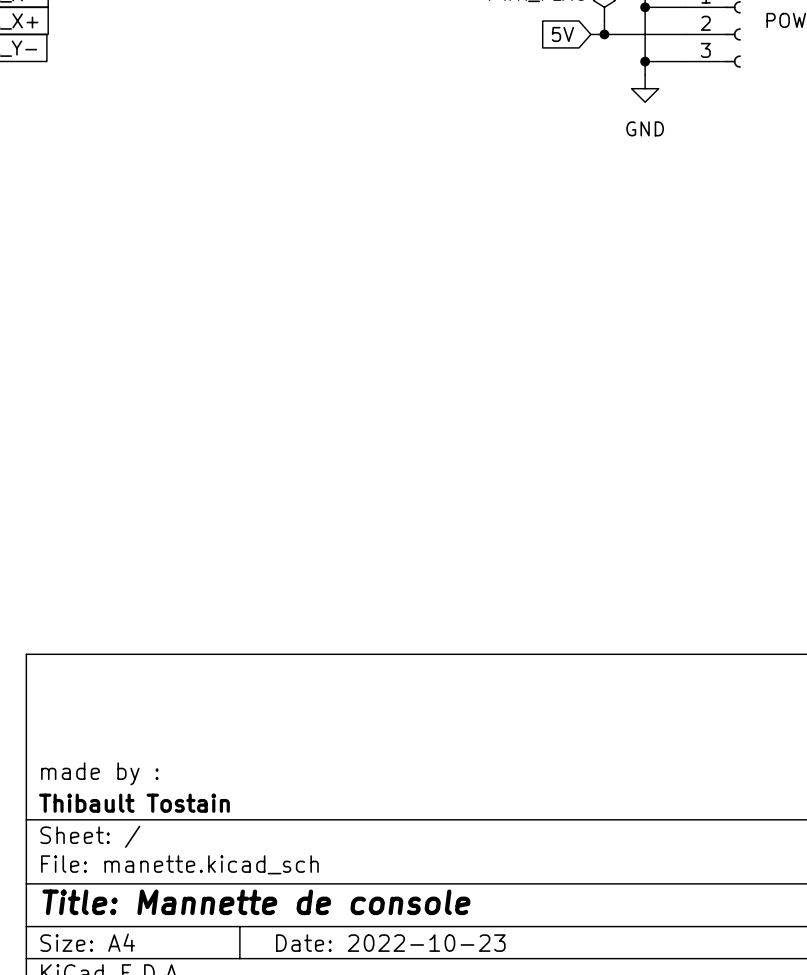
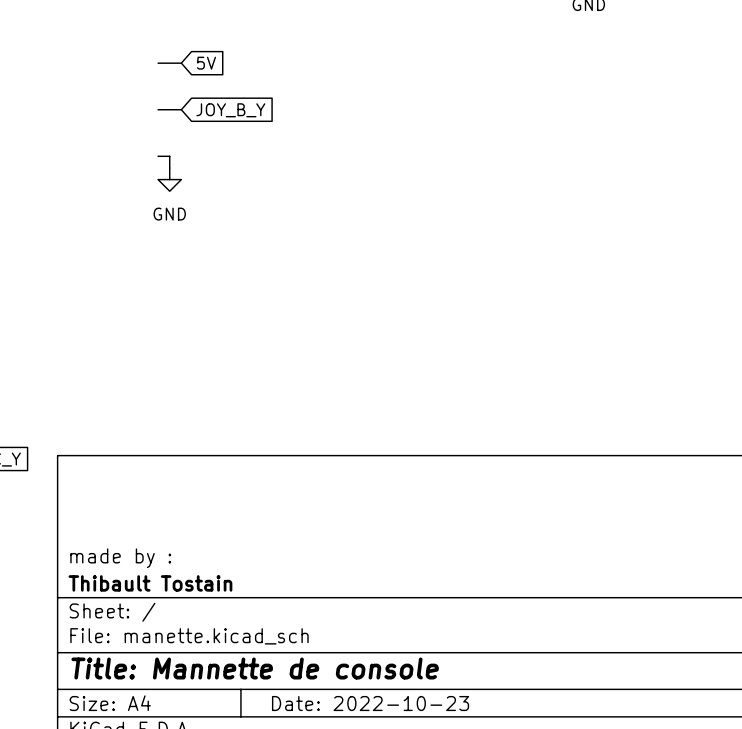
wire: none -> (158, 63) (181, 63)
global label: none -> 5V (206, 63)
wire: none -> (158, 109) (181, 109)
global label: none -> JOY_B_Y (230, 110)
wire: none -> (158, 156) (169, 156) (169, 167)
power symbol: none -> GND (169, 179)

